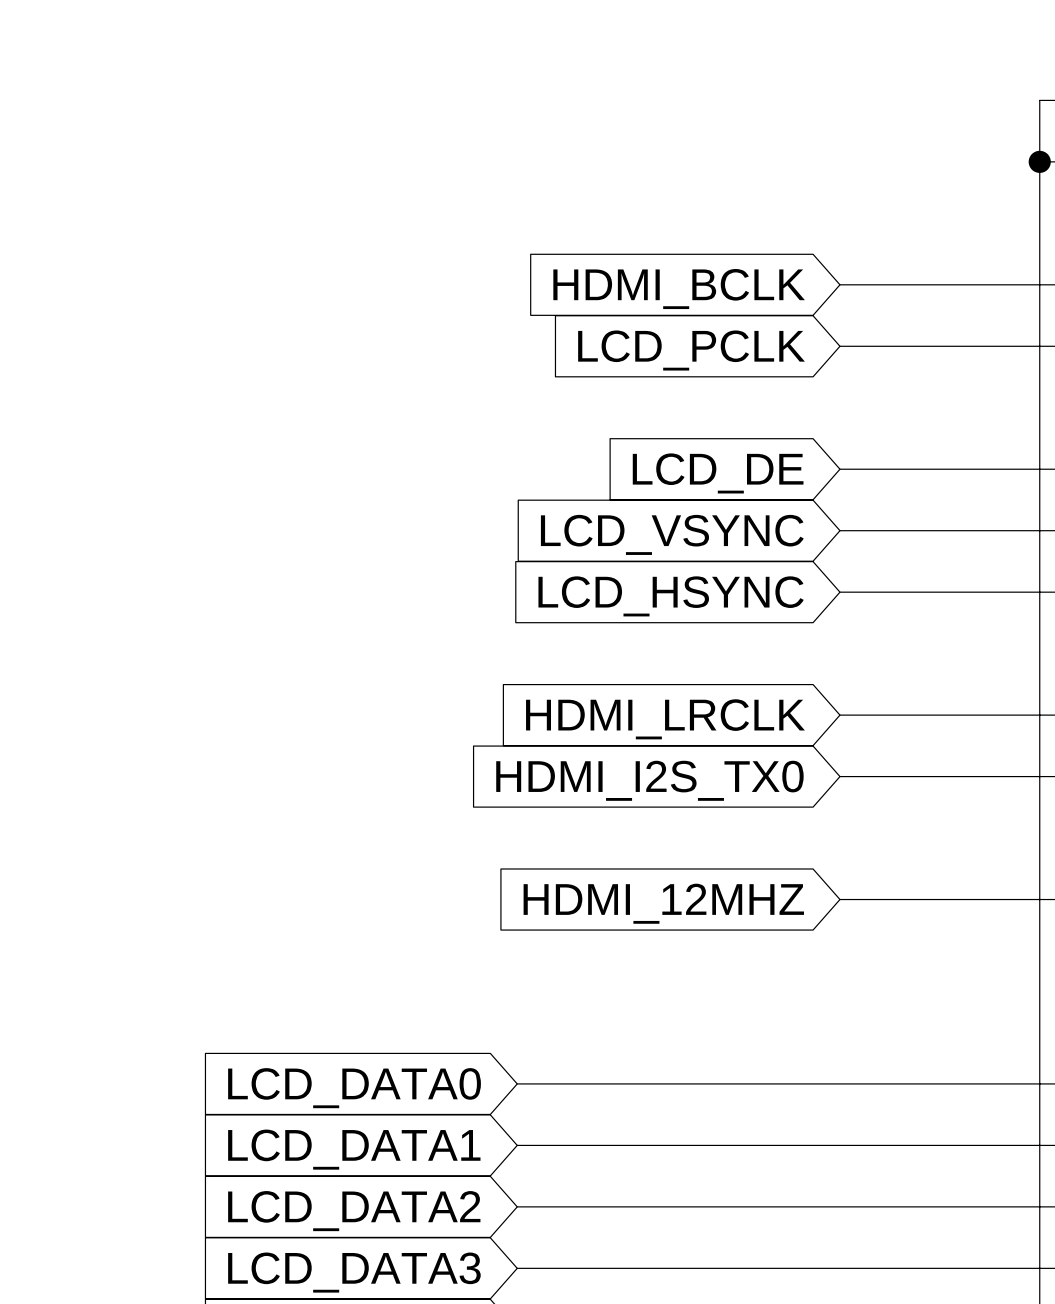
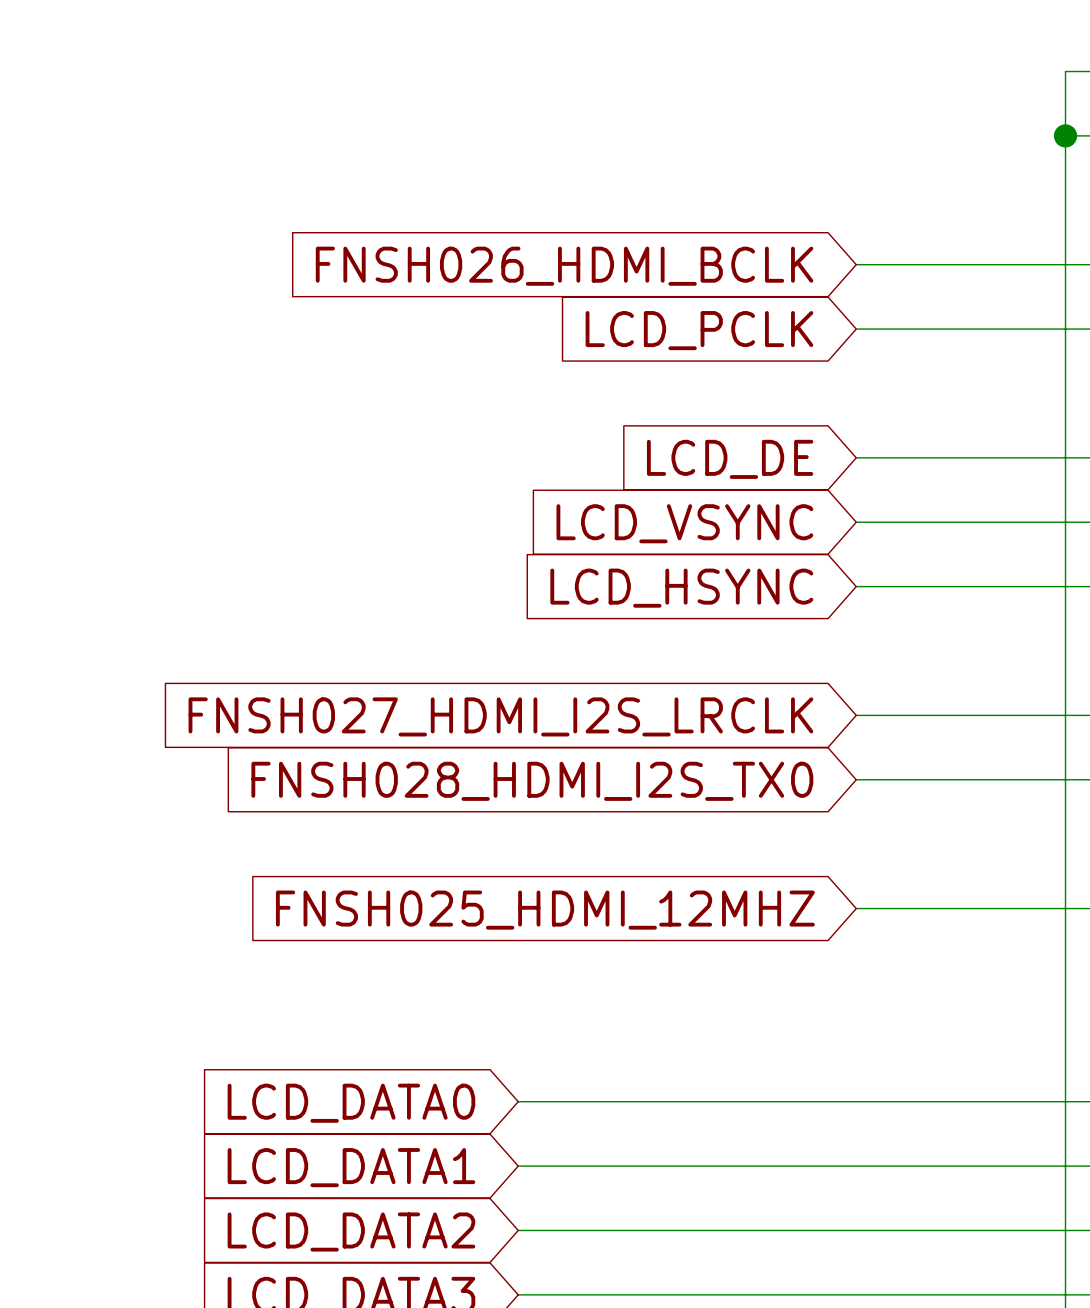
global label: HDMI_BCLK (679, 289) -> FNSH026_HDMI_BCLK (564, 266)
global label: HDMI_LRCLK (665, 719) -> FNSH027_HDMI_I2S_LRCLK (500, 716)
global label: HDMI_I2S_TX0 (649, 780) -> FNSH028_HDMI_I2S_TX0 (532, 781)
global label: HDMI_12MHZ (663, 903) -> FNSH025_HDMI_12MHZ (545, 910)

